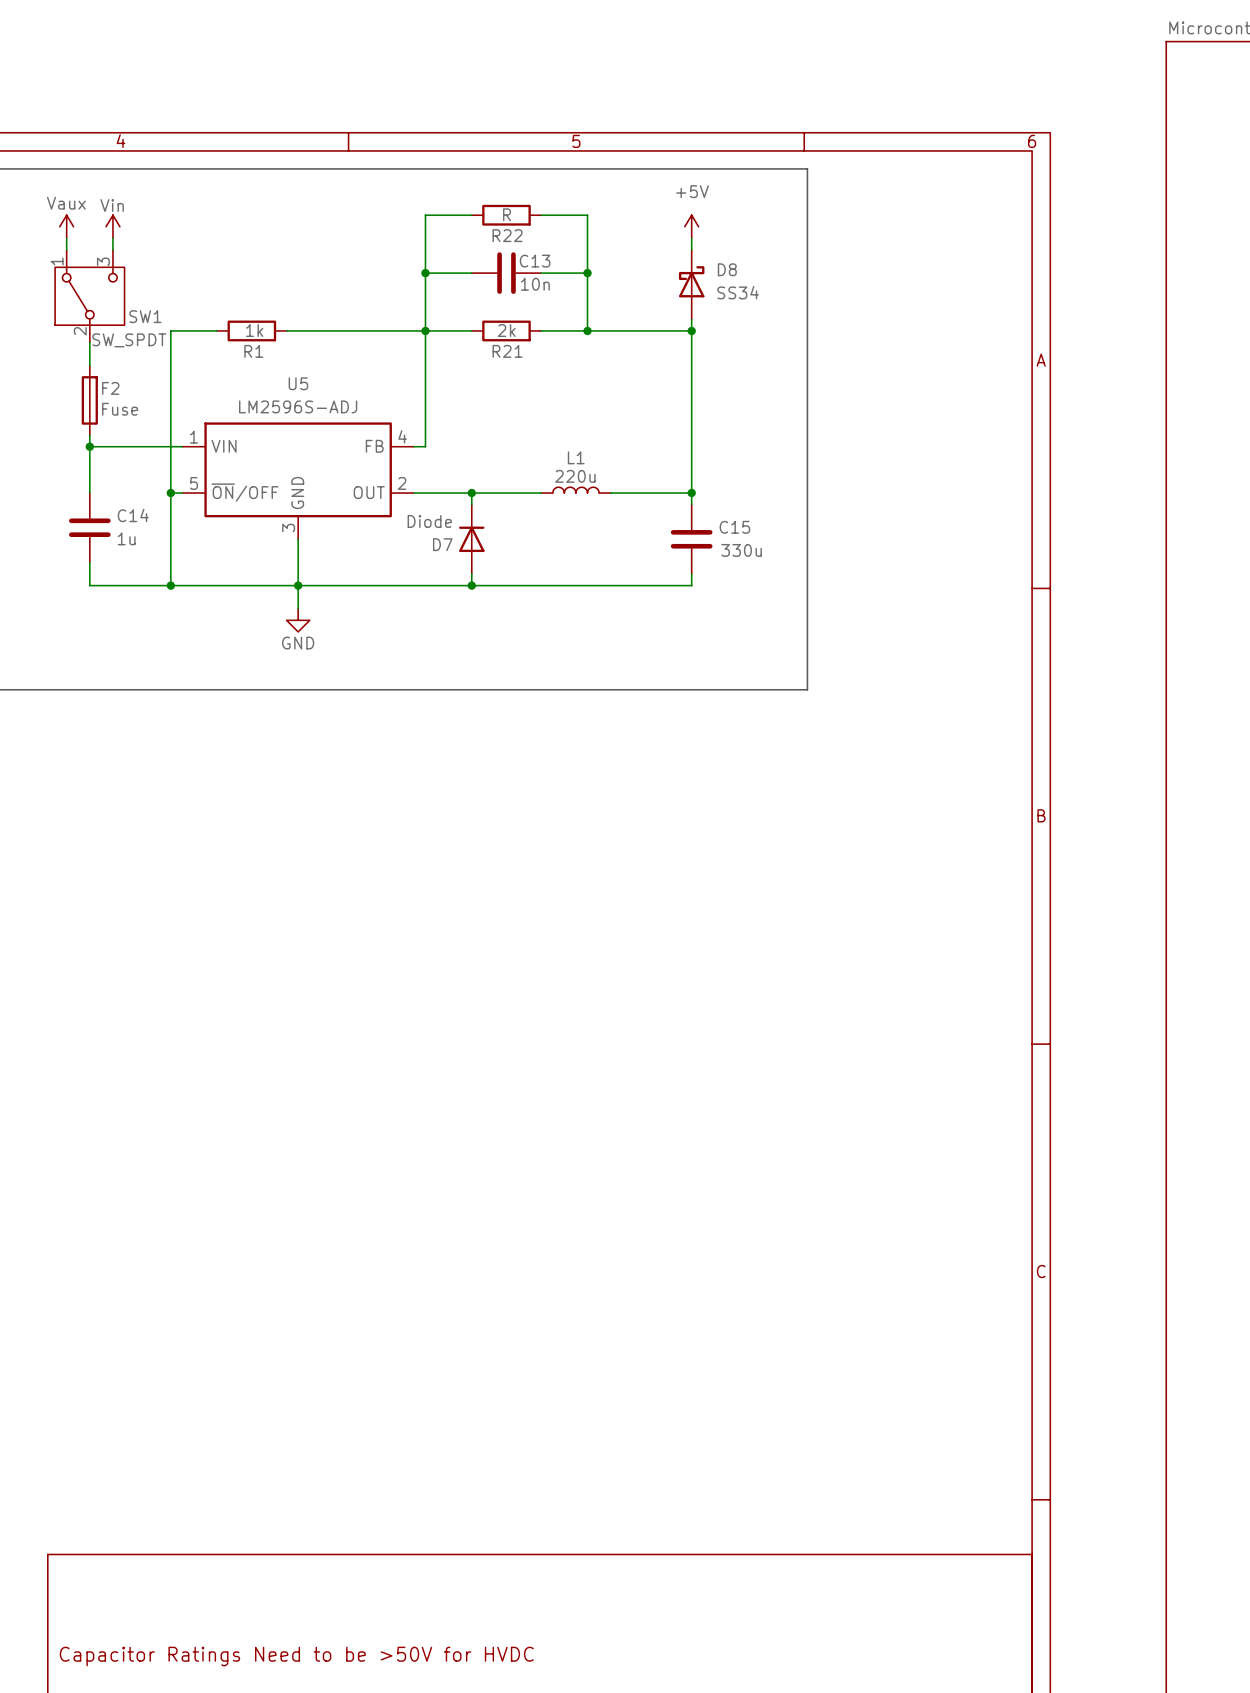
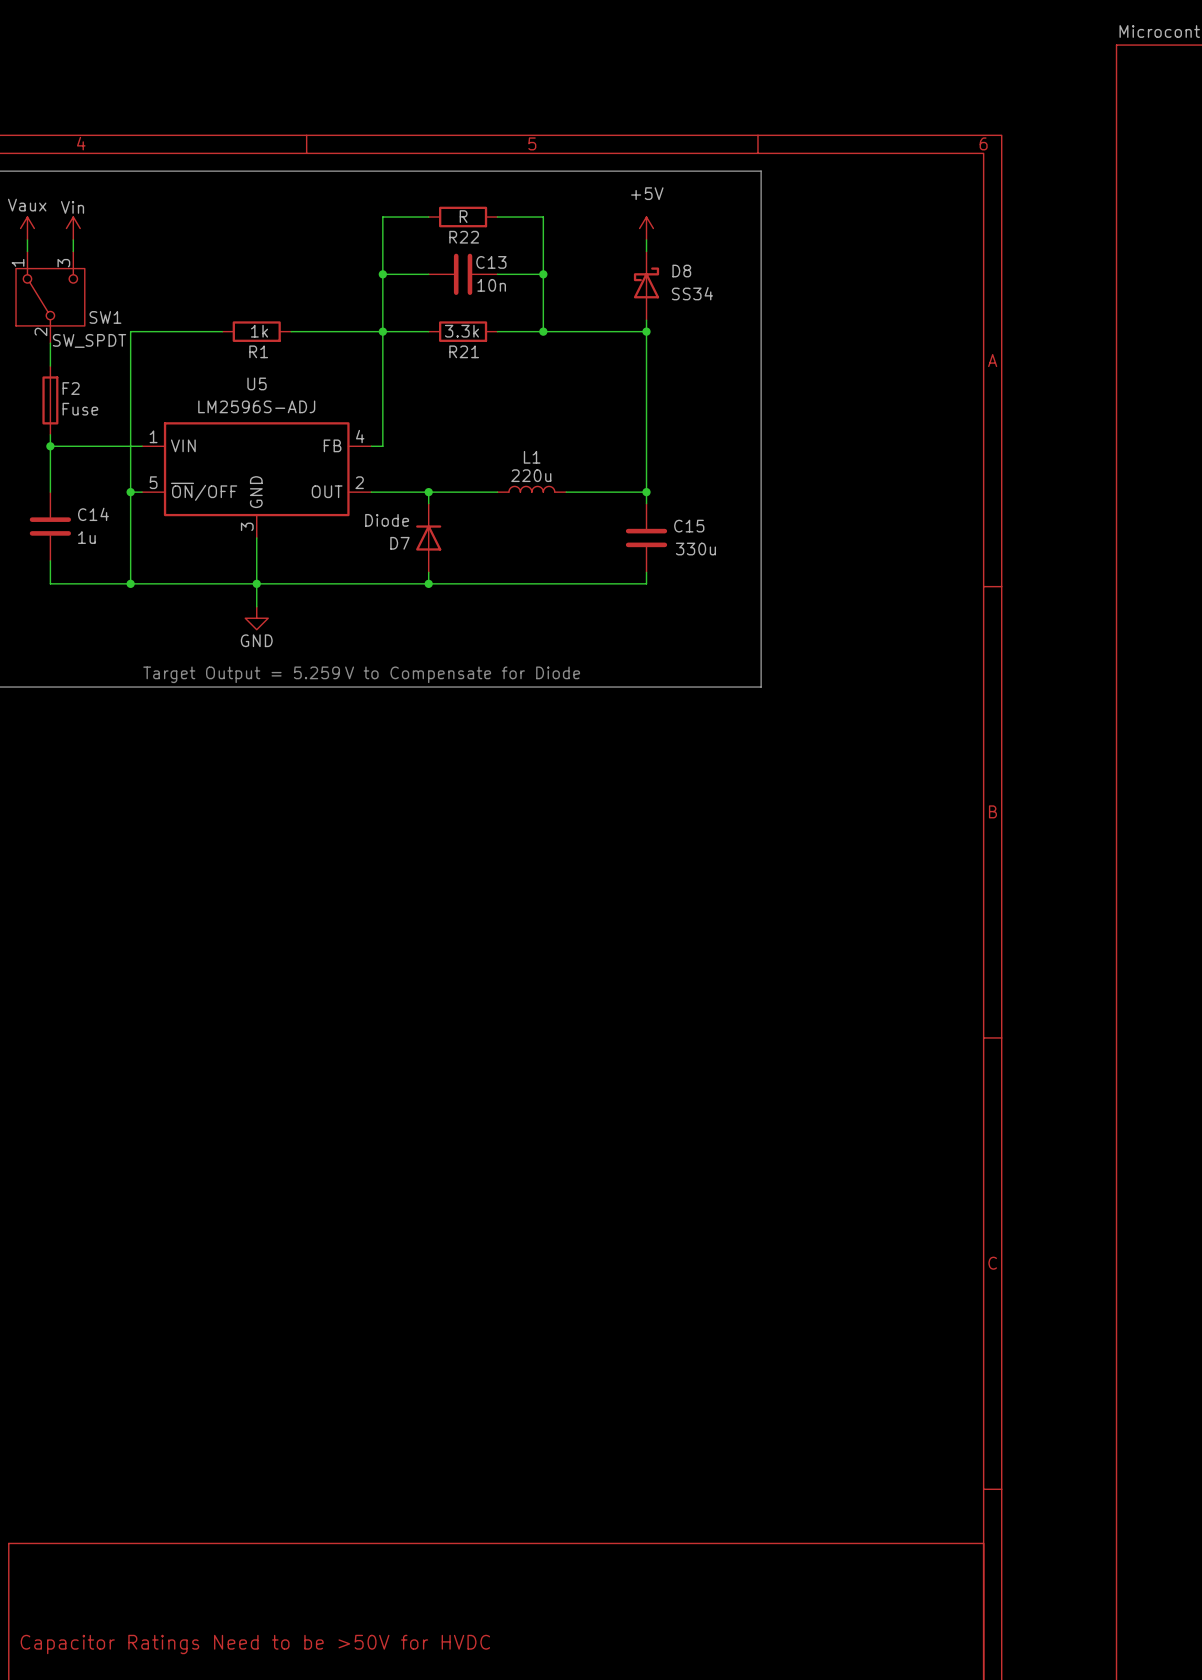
R1 position: (251, 330) -> (256, 331)
wire: (286, 330) (332, 330) -> (176, 331) (222, 331)
R21 value: 2k (506, 330) -> 3.3k (461, 331)
text: none -> Target Output = 5.259 V to Compensate for Diode (361, 674)

